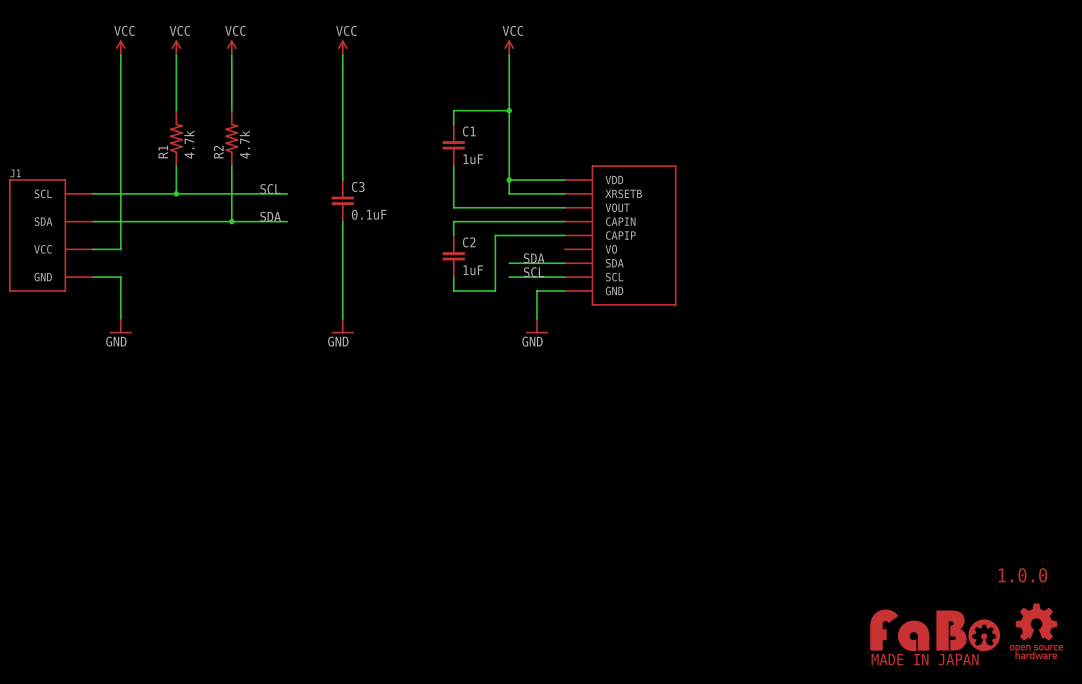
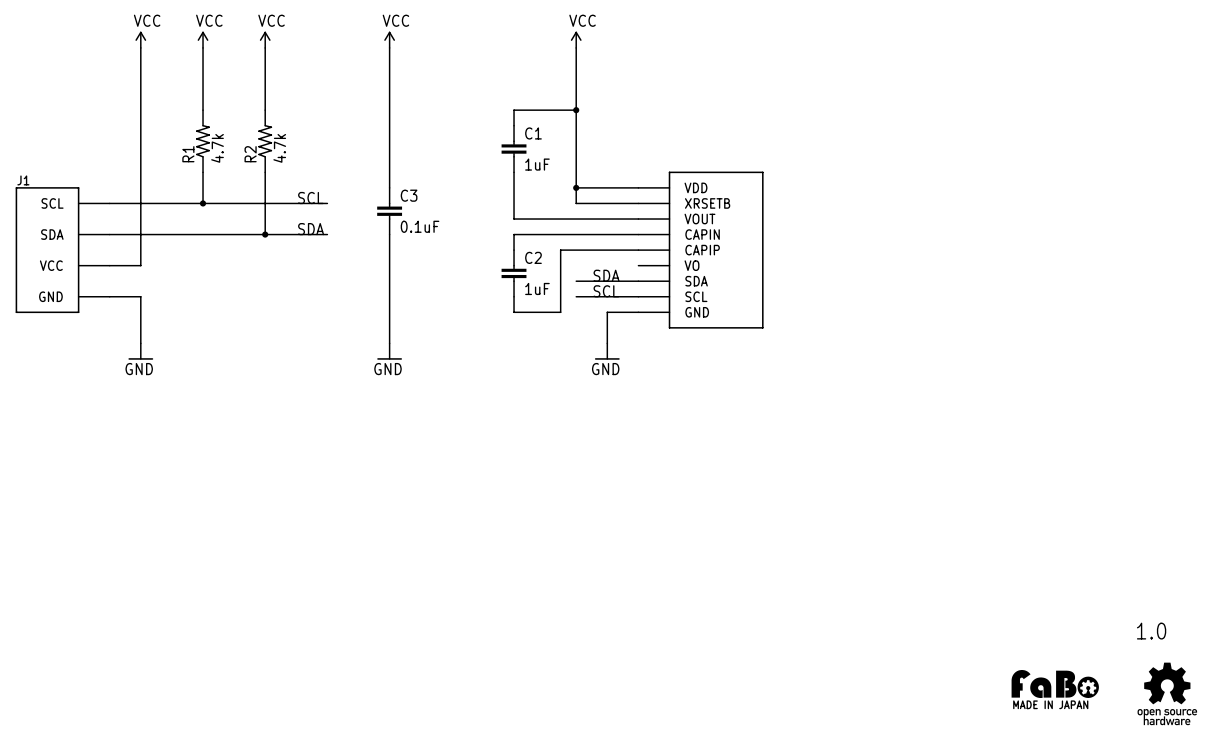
text: 1.0.0 (1022, 575) -> 1.0 (1151, 631)
part: none -> (1055, 684)
part: (935, 630) -> none

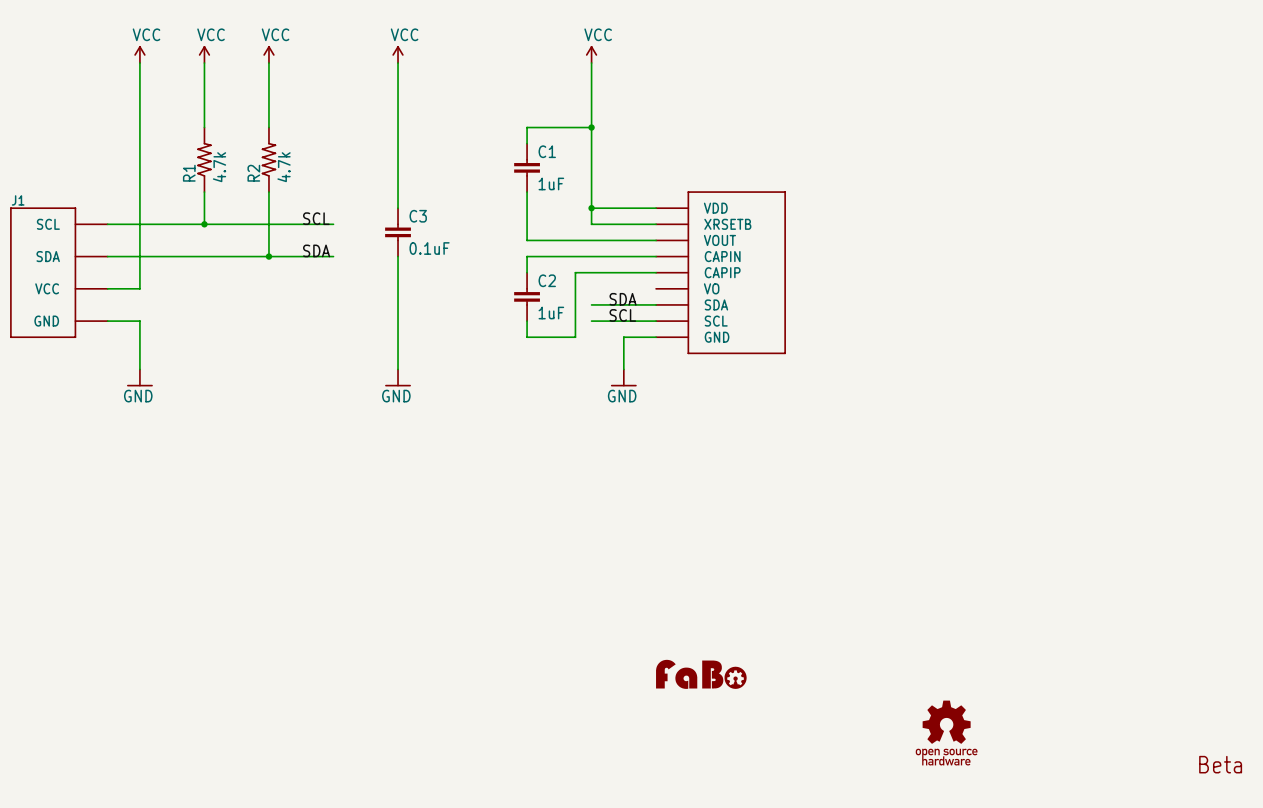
text: 1.0 (1151, 631) -> none
part: none -> (701, 674)
part: (1055, 684) -> none
part: none -> (946, 733)
part: (1167, 693) -> none
text: none -> Beta (1220, 764)

